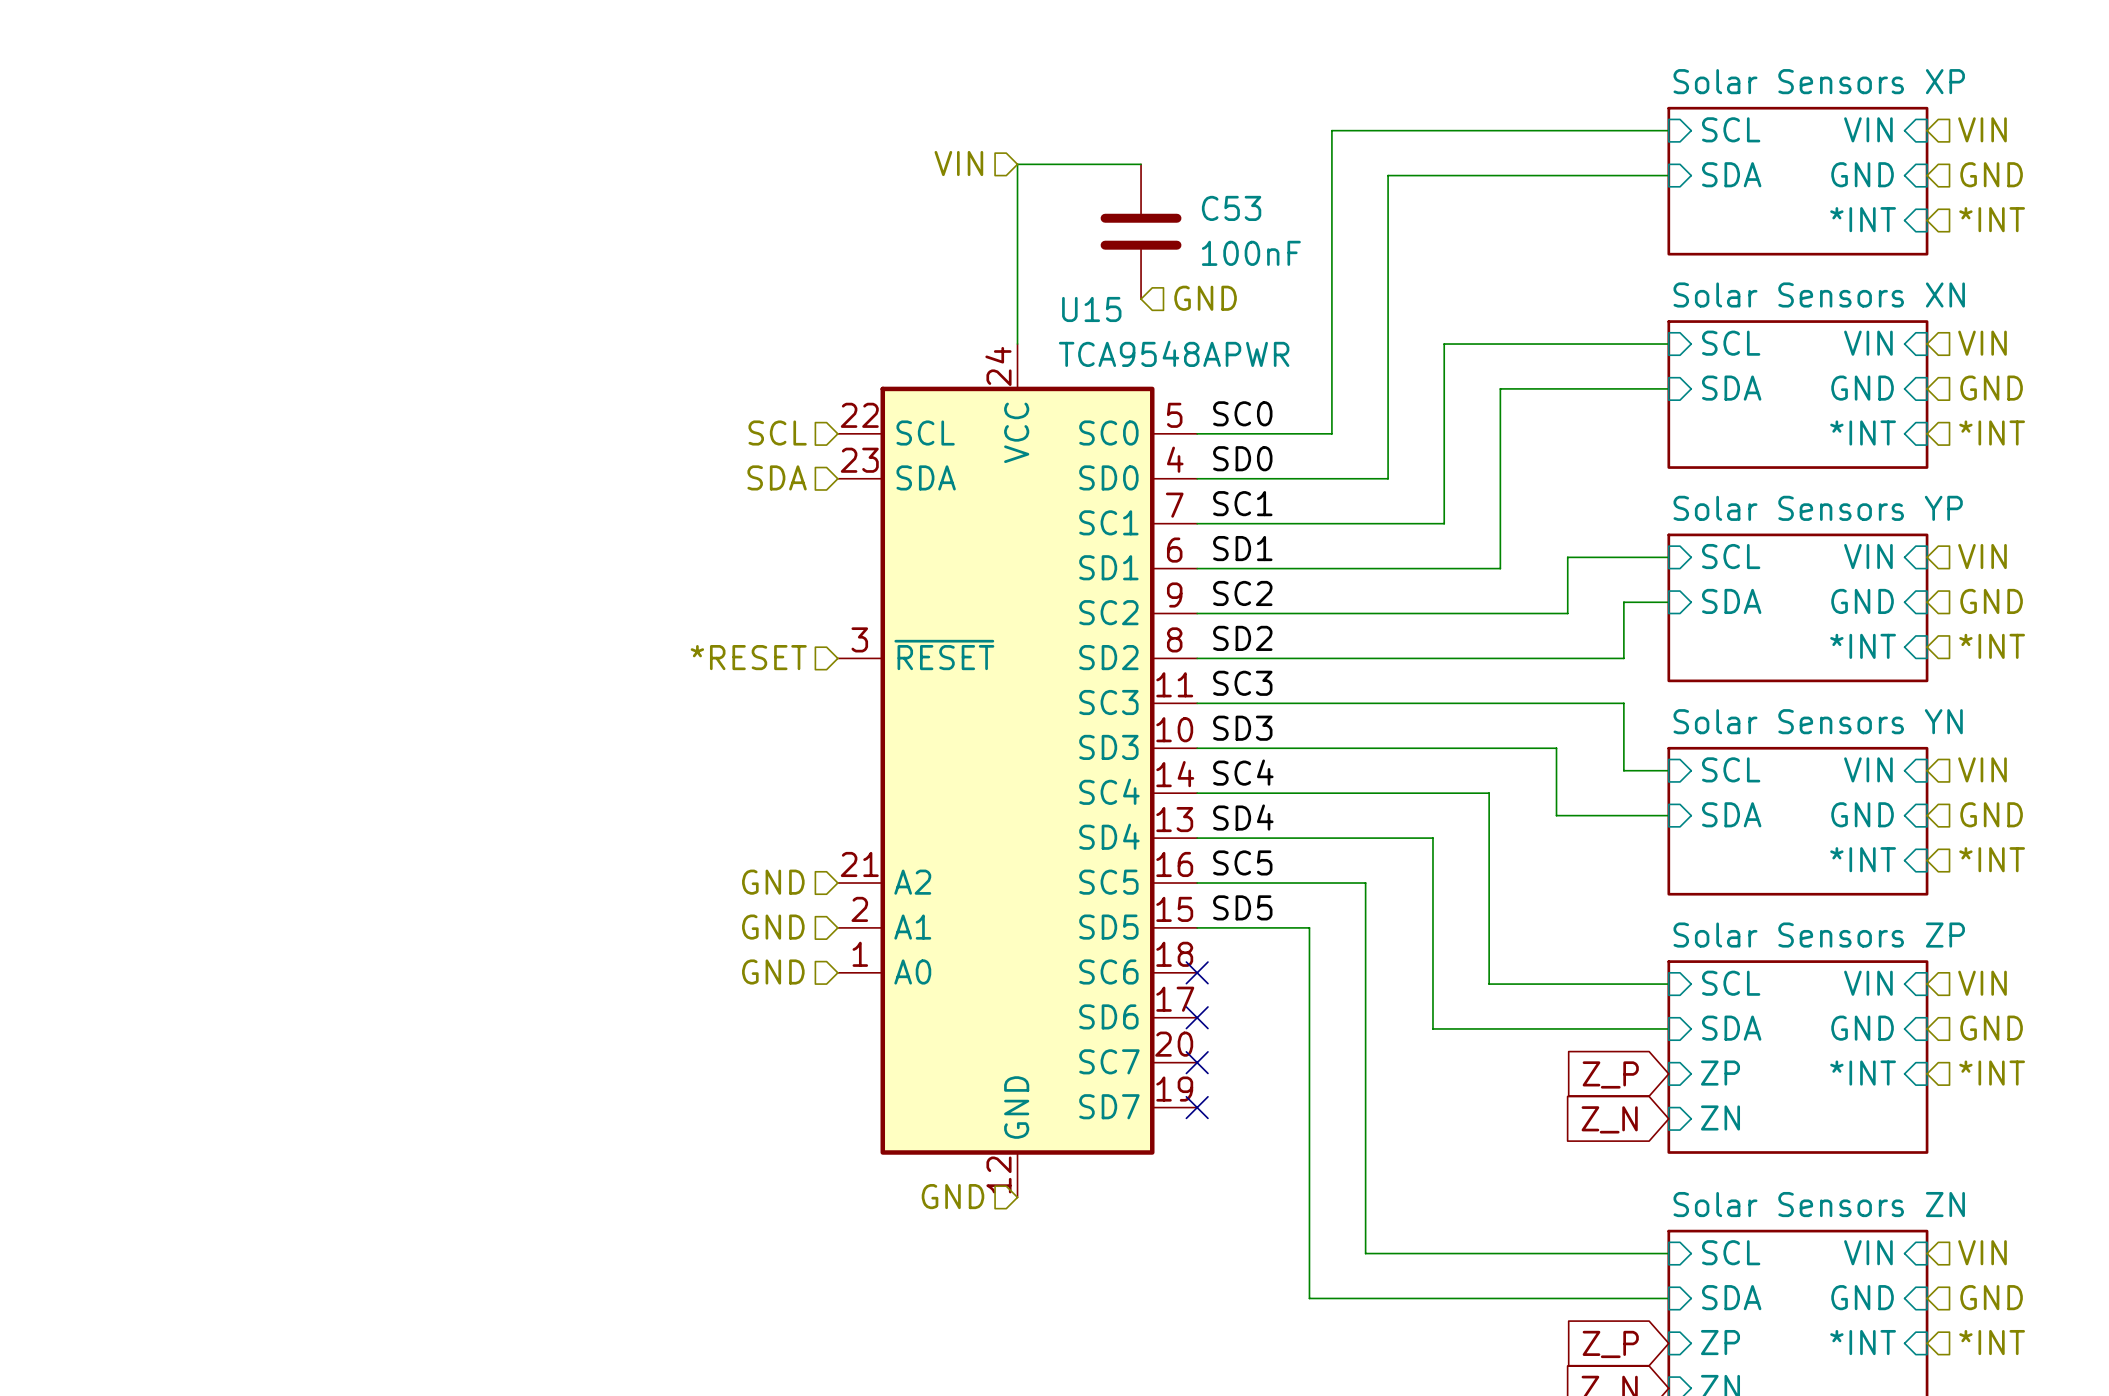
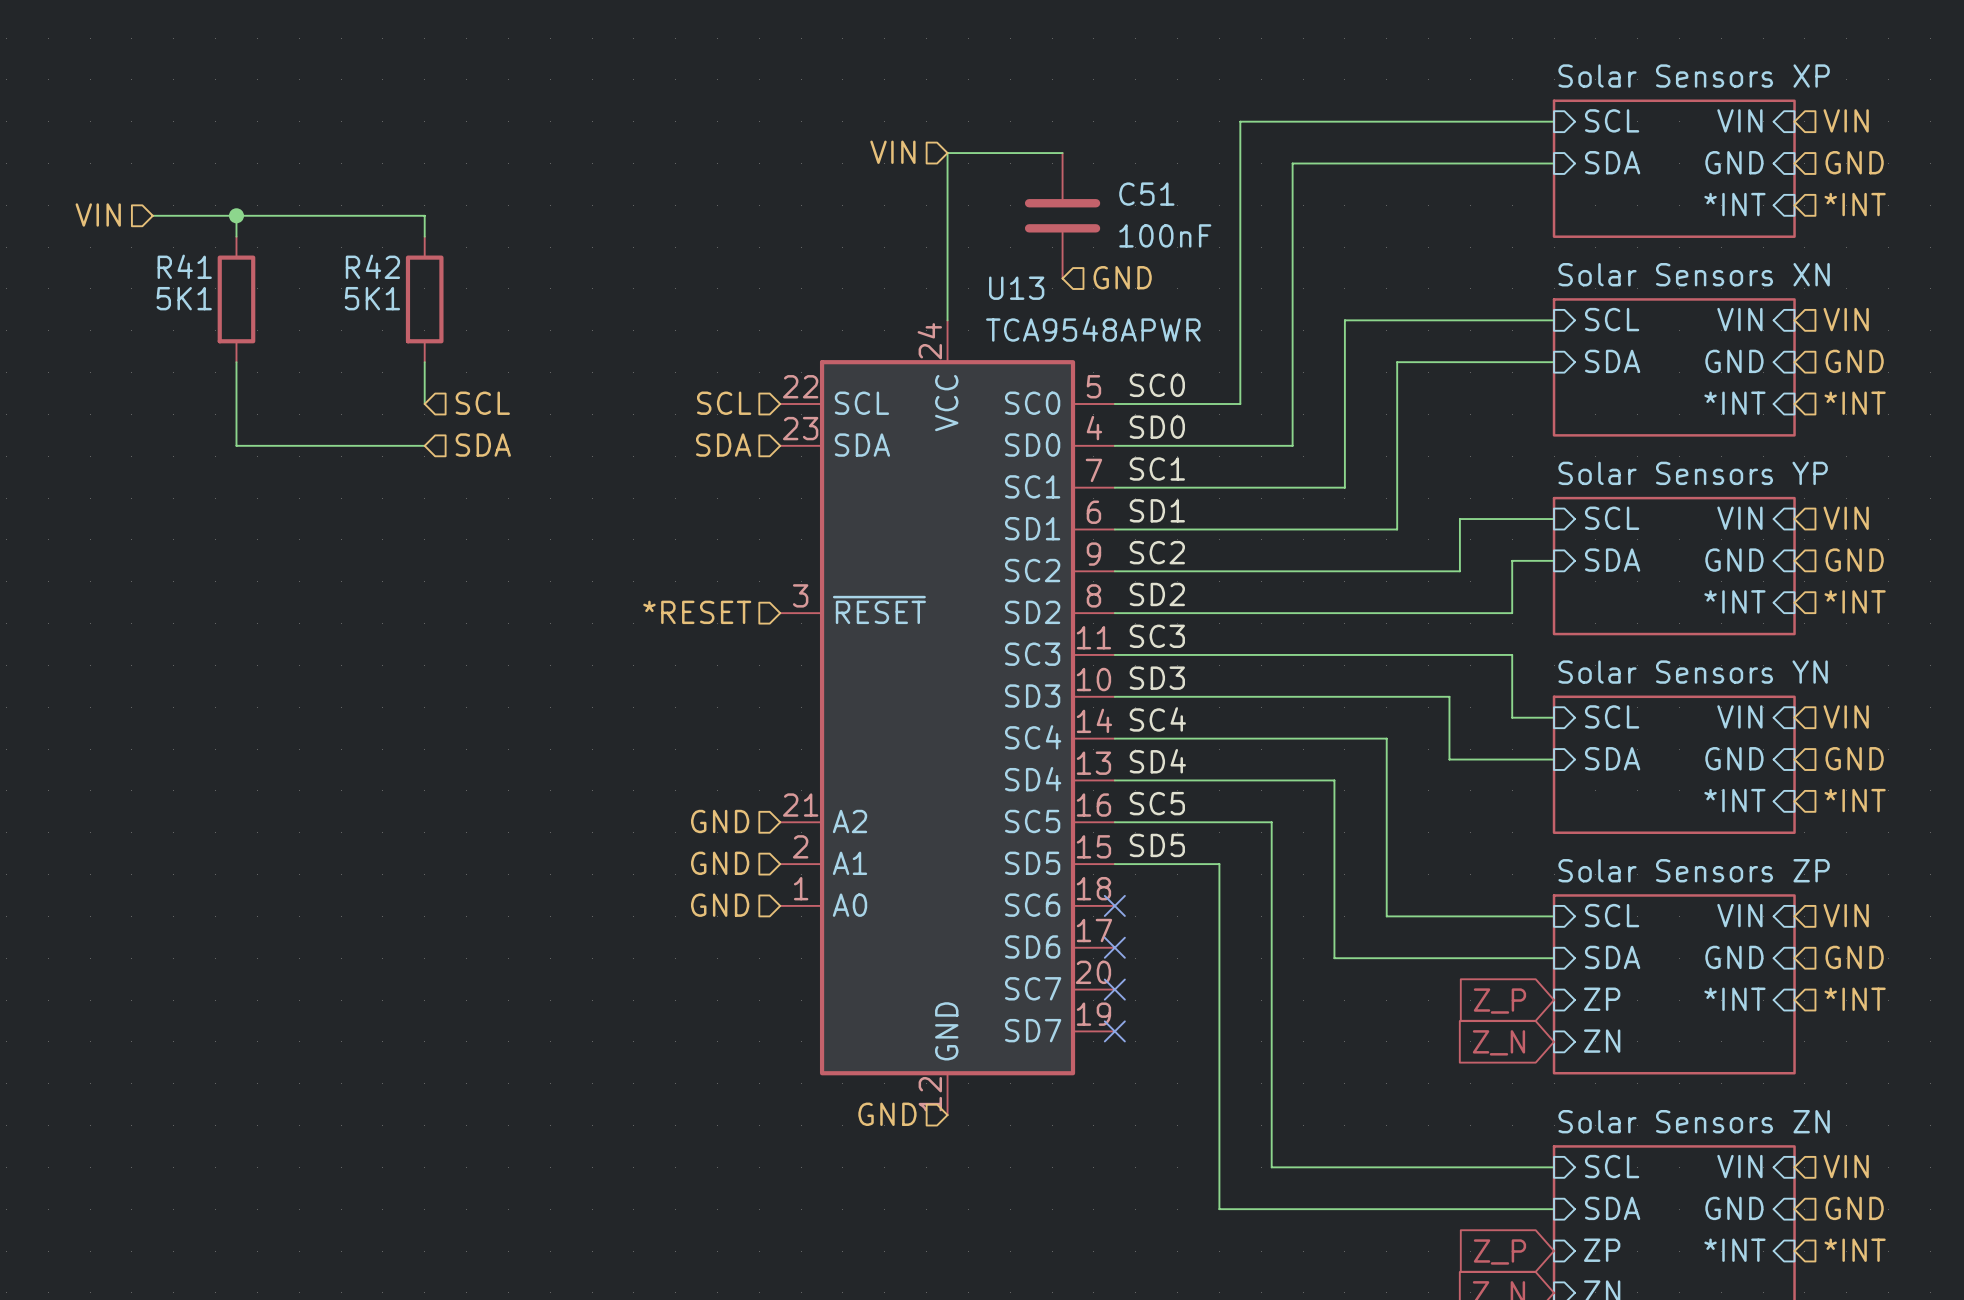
C53 name: C53 (1231, 208) -> C51 (1146, 194)
hierarchical label: none -> VIN (98, 215)
wire: none -> (152, 215) (424, 215) (424, 236)
wire: none -> (236, 215) (236, 236)
junction: none -> (236, 215)
U15 name: U15 (1091, 309) -> U13 (1016, 288)
R41: none -> 5K1 (236, 299)
R42: none -> 5K1 (424, 299)
wire: none -> (236, 362) (236, 445) (424, 445)
wire: none -> (424, 362) (424, 404)
hierarchical label: none -> SCL (482, 403)
hierarchical label: none -> SDA (483, 445)

